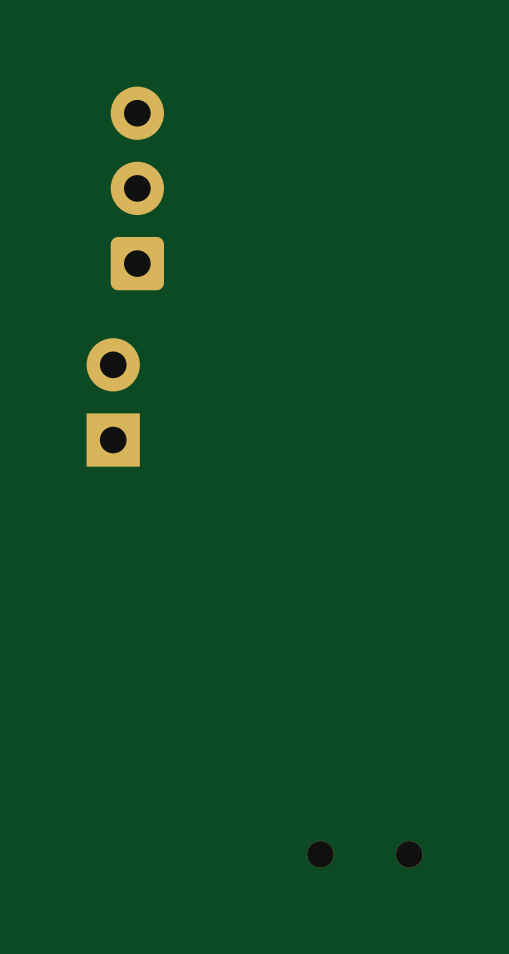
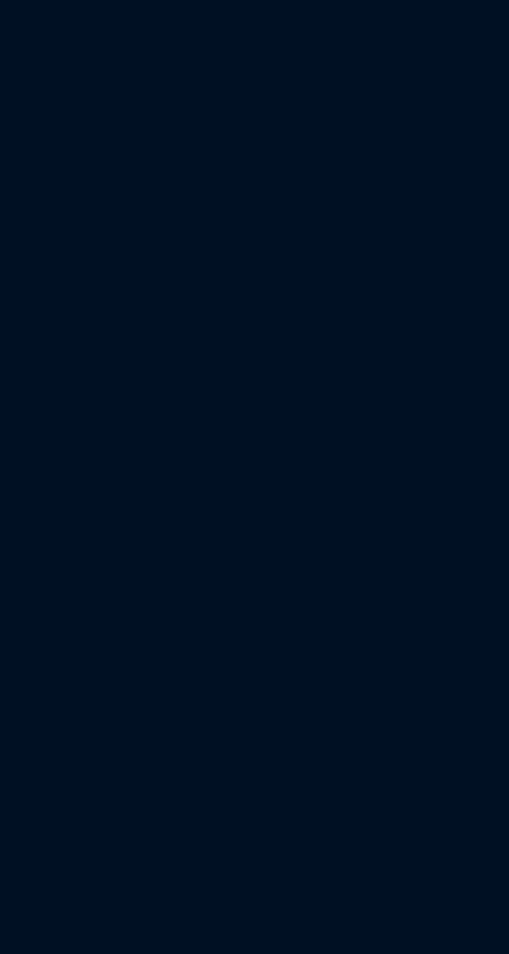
part: (137, 188) -> none
part: (113, 402) -> none
part: (364, 854) -> none

